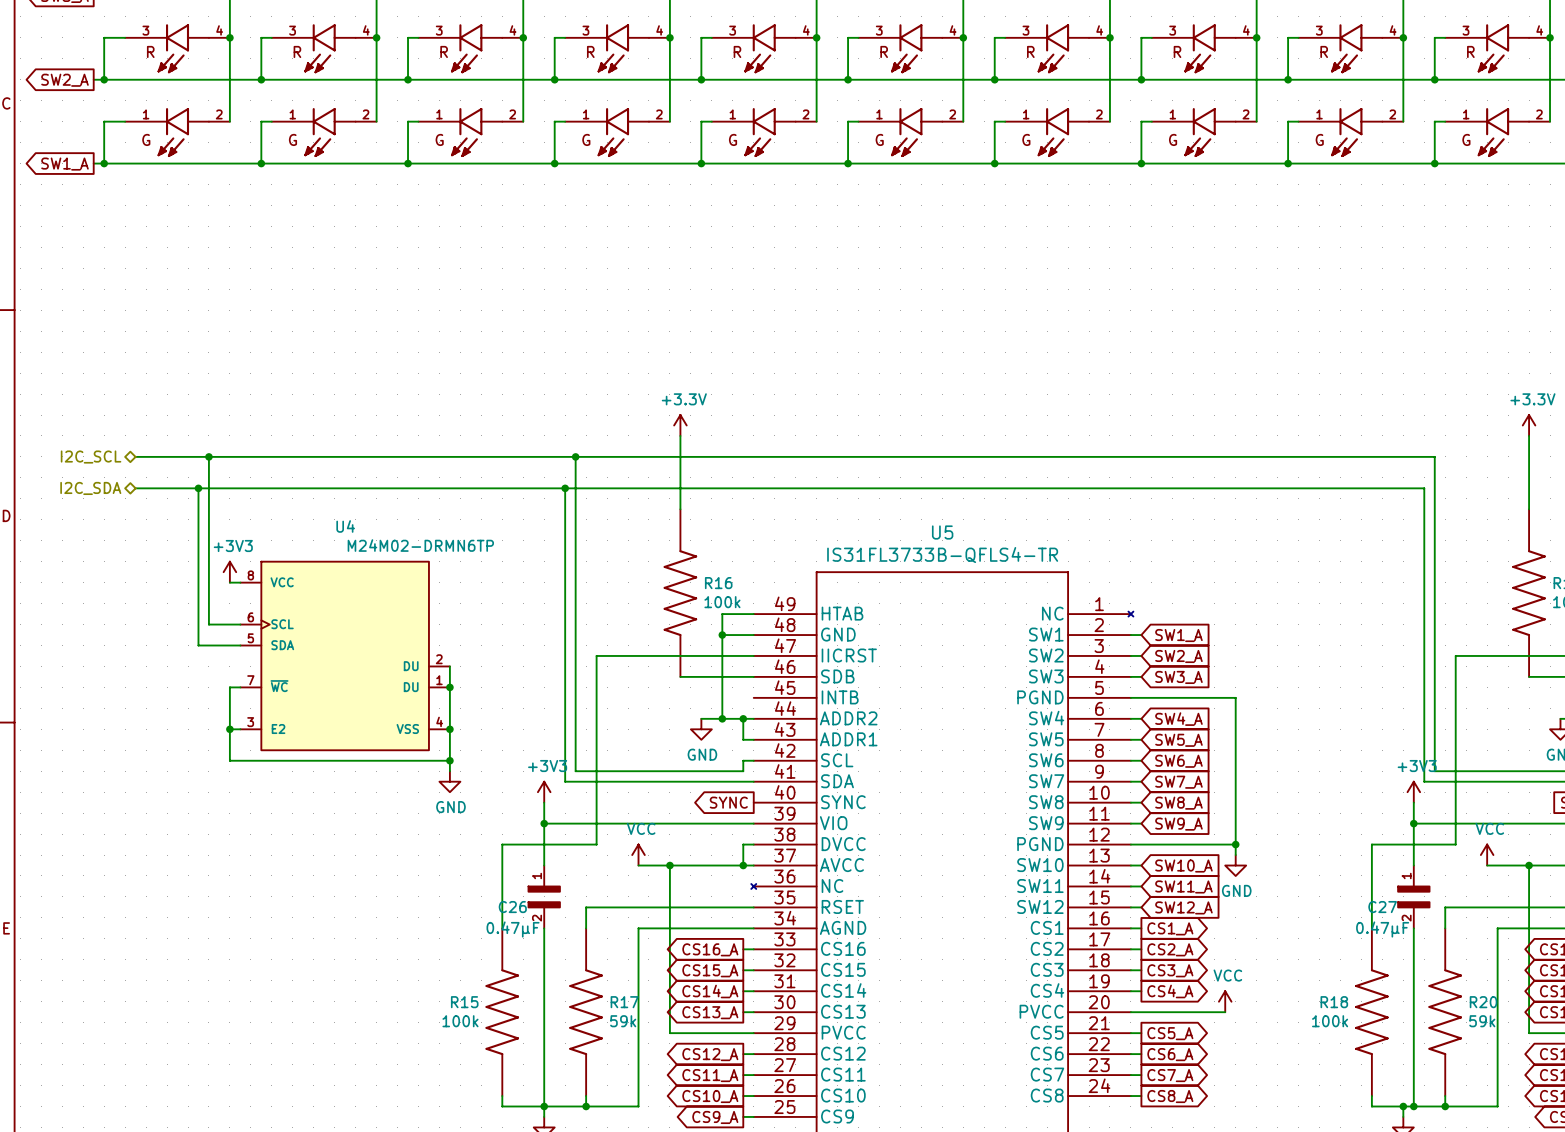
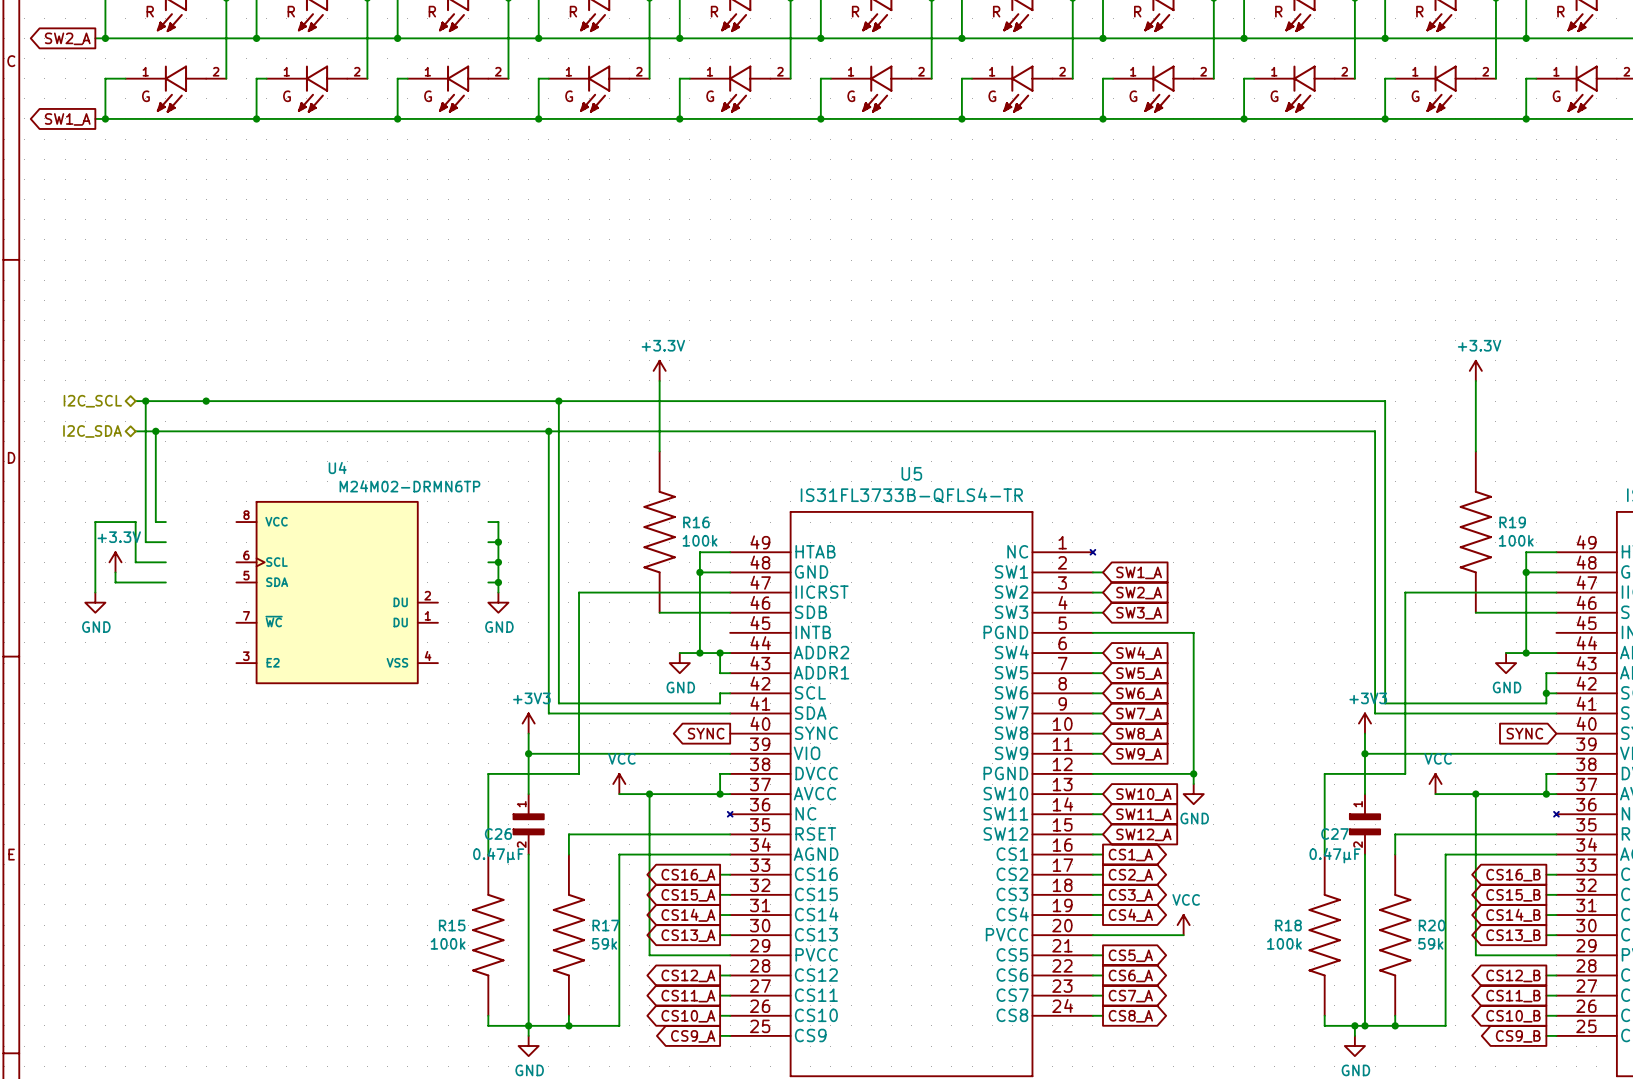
wire: none -> (145, 401) (145, 542) (165, 542)
junction: none -> (145, 401)
wire: (208, 456) (208, 624) (240, 624) -> none
wire: none -> (155, 431) (155, 522) (165, 522)
junction: none -> (155, 431)
wire: (198, 488) (198, 645) (240, 645) -> none
junction: (198, 488) -> none
power symbol: +3V3 (229, 572) -> none
wire: (229, 582) (240, 582) -> none
wire: none -> (488, 522) (498, 522) (498, 592)
wire: none -> (488, 542) (498, 542)
junction: none -> (498, 542)
power symbol: none -> +3.3V (115, 562)
wire: none -> (165, 562) (135, 562) (135, 522) (95, 522) (95, 592)
wire: none -> (488, 562) (498, 562)
junction: none -> (498, 562)
wire: none -> (115, 572) (115, 582) (165, 582)
wire: none -> (488, 582) (498, 582)
junction: none -> (498, 582)
power symbol: none -> GND (95, 602)
wire: (449, 666) (449, 771) -> none
wire: (240, 687) (229, 687) (229, 760) (449, 760) -> none
junction: (449, 687) -> none
wire: (229, 729) (240, 729) -> none
junction: (229, 729) -> none
junction: (449, 729) -> none
junction: (449, 760) -> none
power symbol position: GND (449, 781) -> GND (498, 602)

